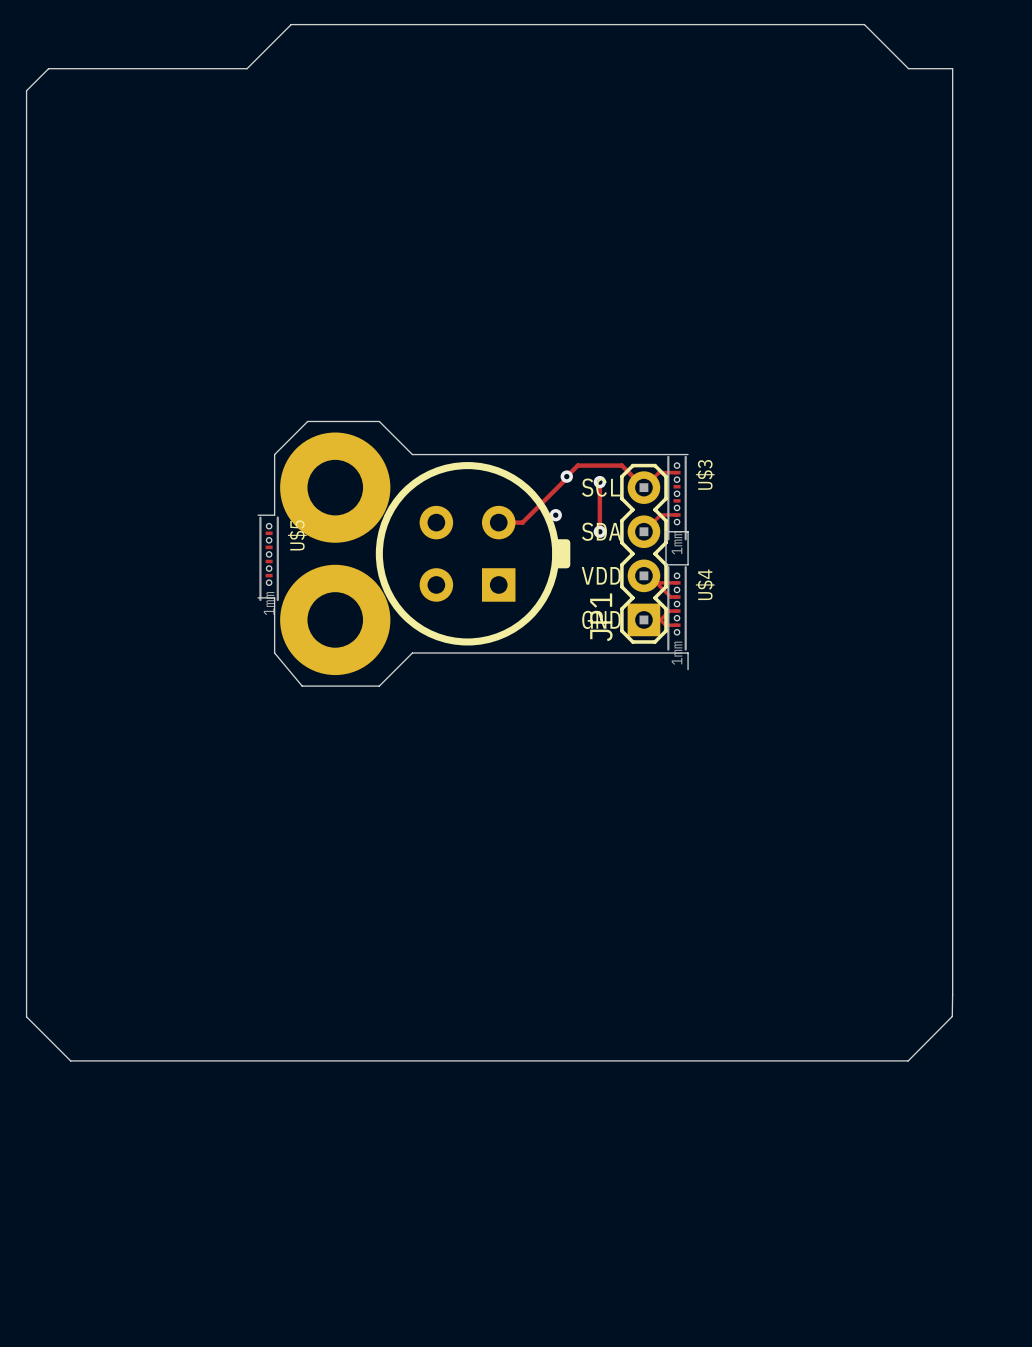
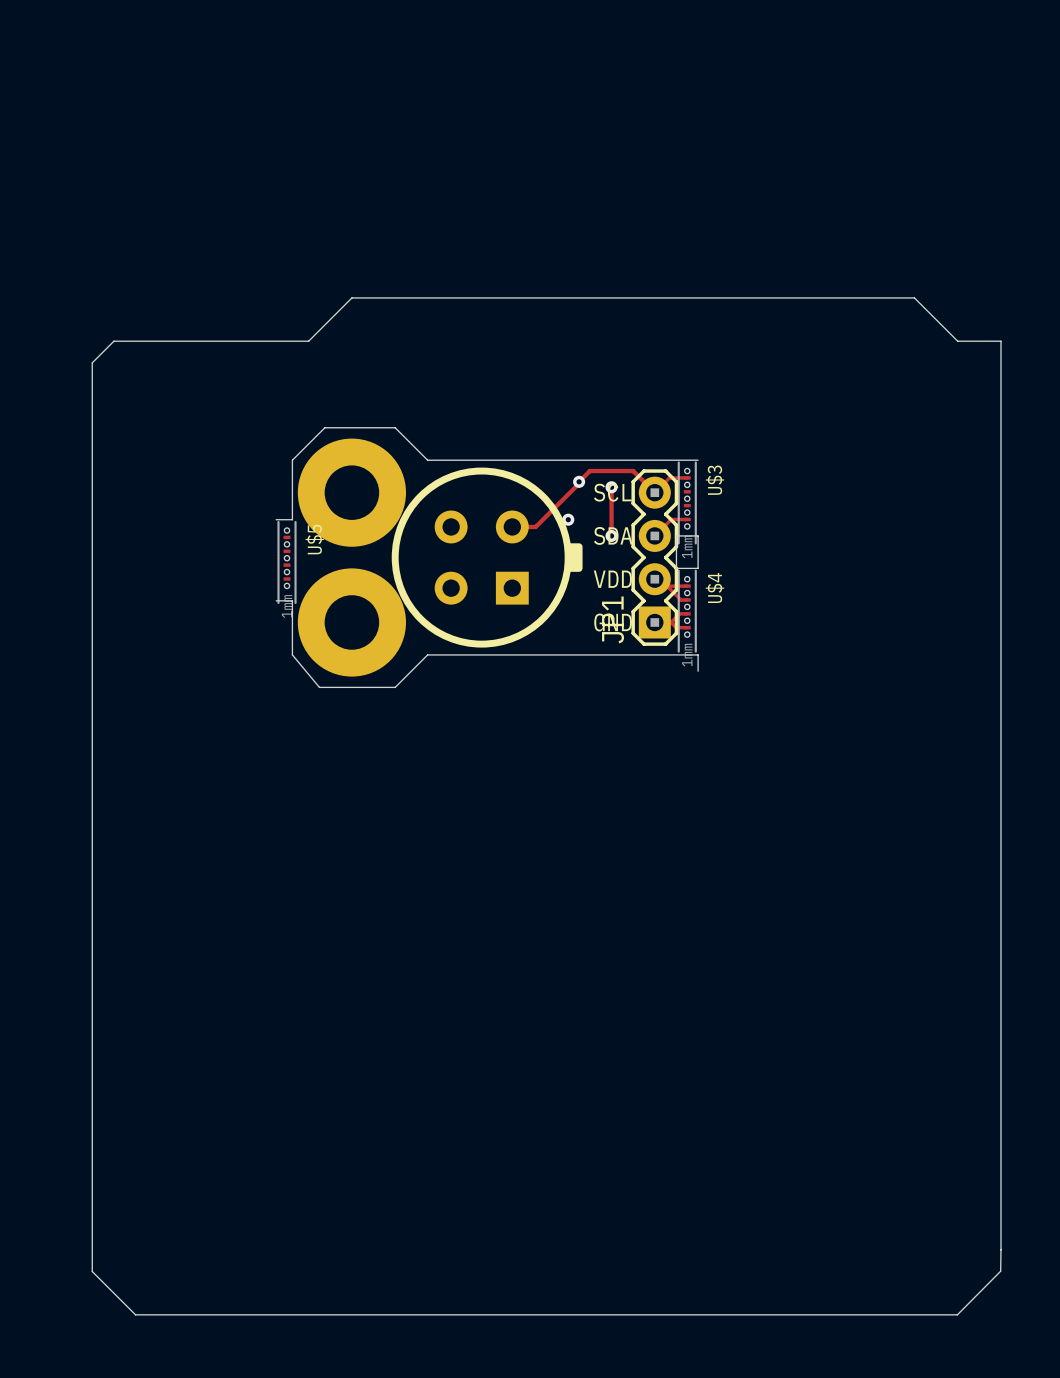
board edge: (291, 24) (247, 68) (48, 68) (26, 90) (26, 1016) (70, 1060) (908, 1060) (952, 1016) (952, 68) (908, 68) (864, 24) (291, 24) -> (351, 297) (308, 341) (113, 341) (92, 362) (92, 1271) (135, 1314) (957, 1314) (1000, 1271) (1001, 341) (957, 341) (914, 297) (351, 297)

